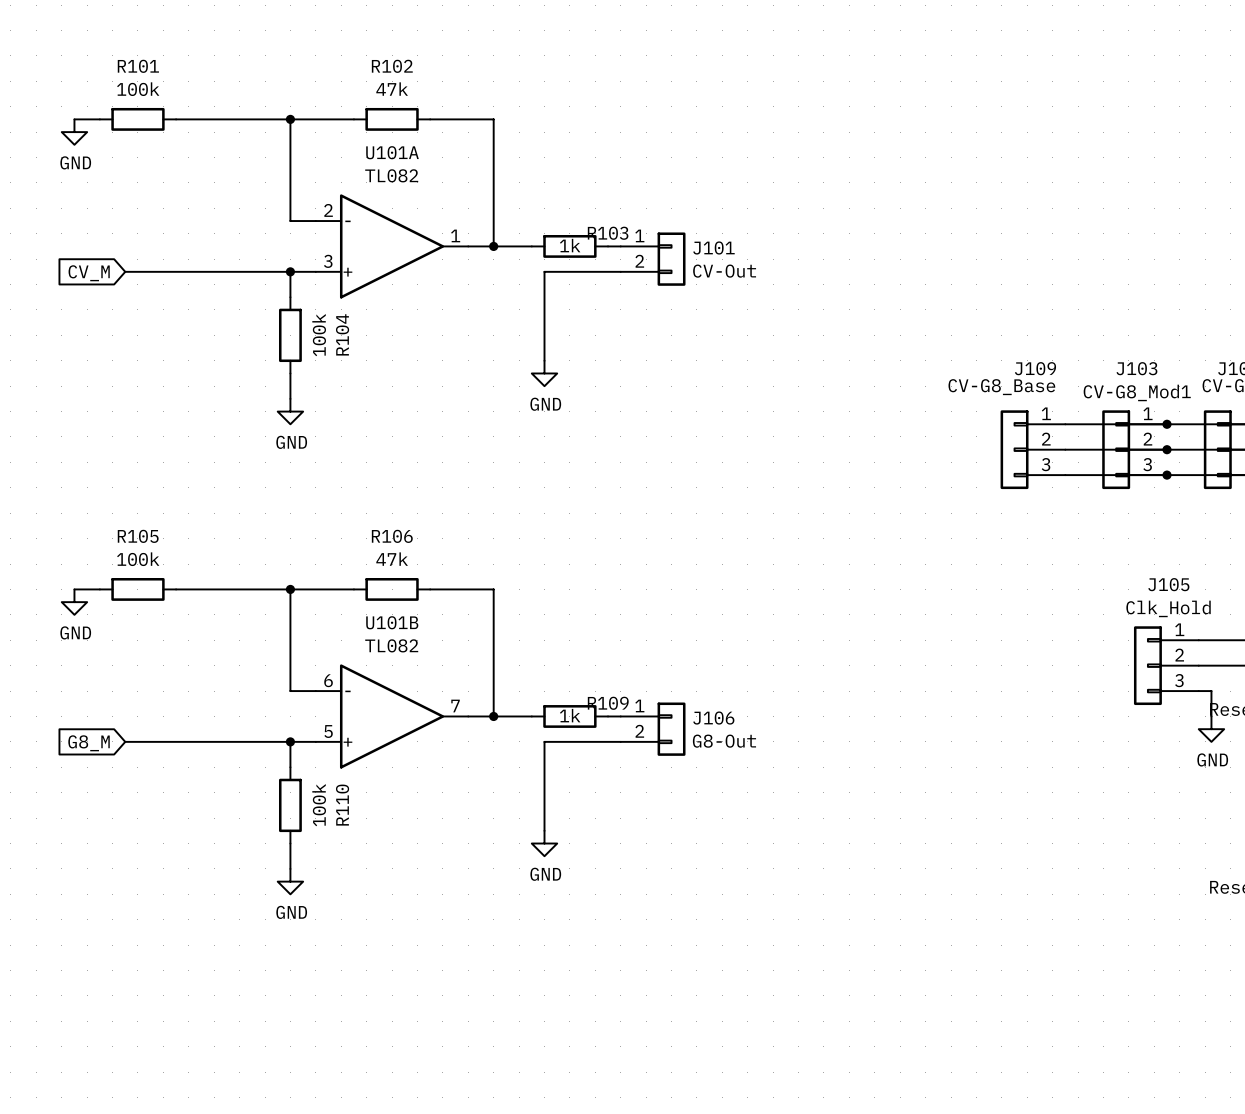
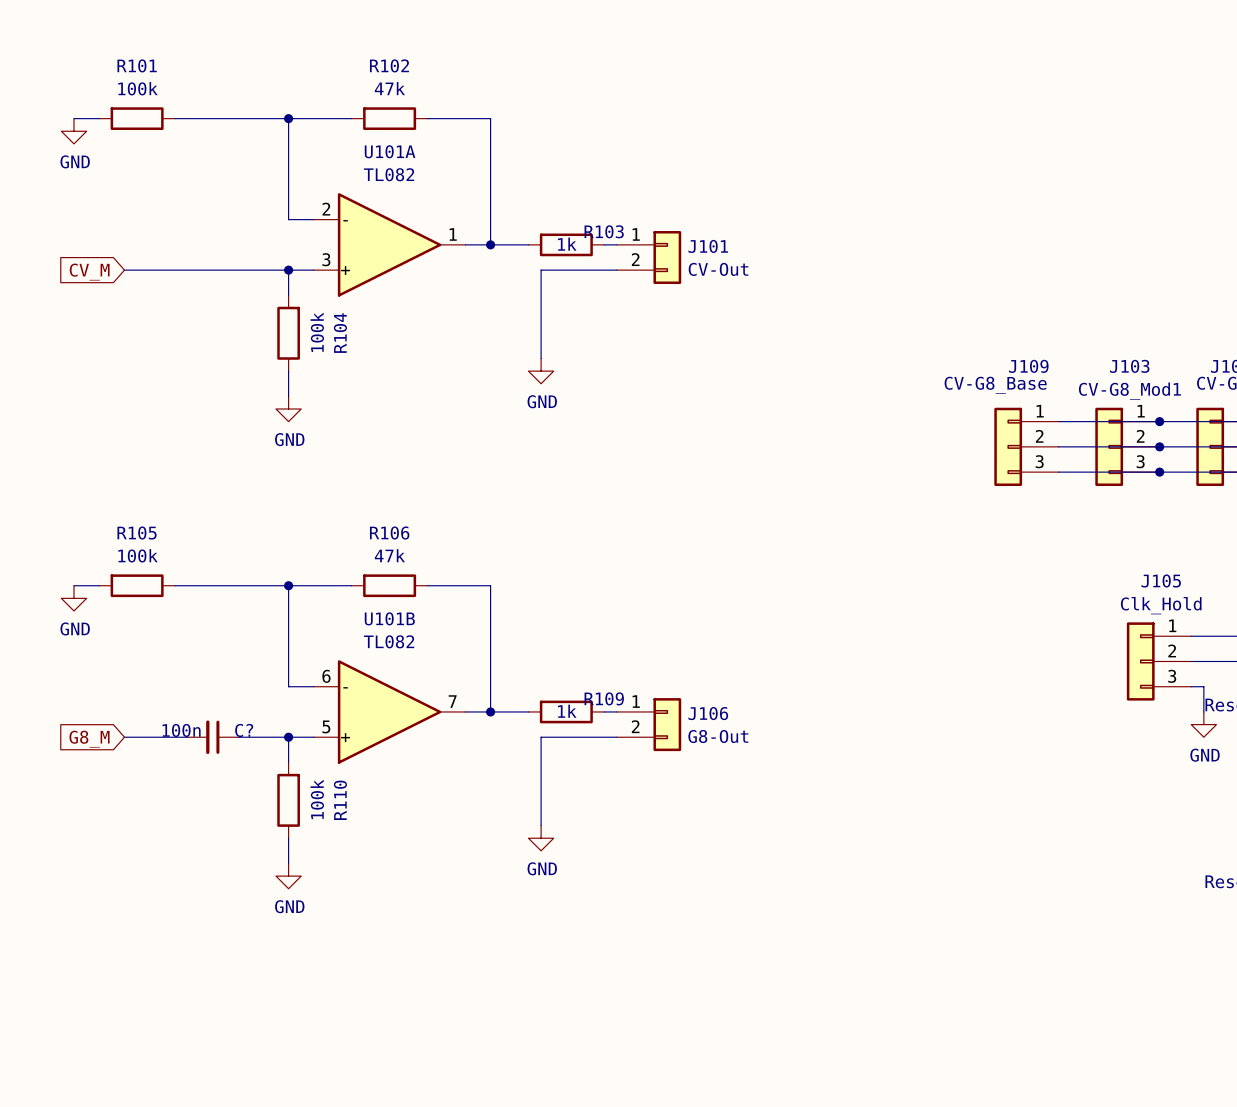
C?: none -> 100n (212, 737)

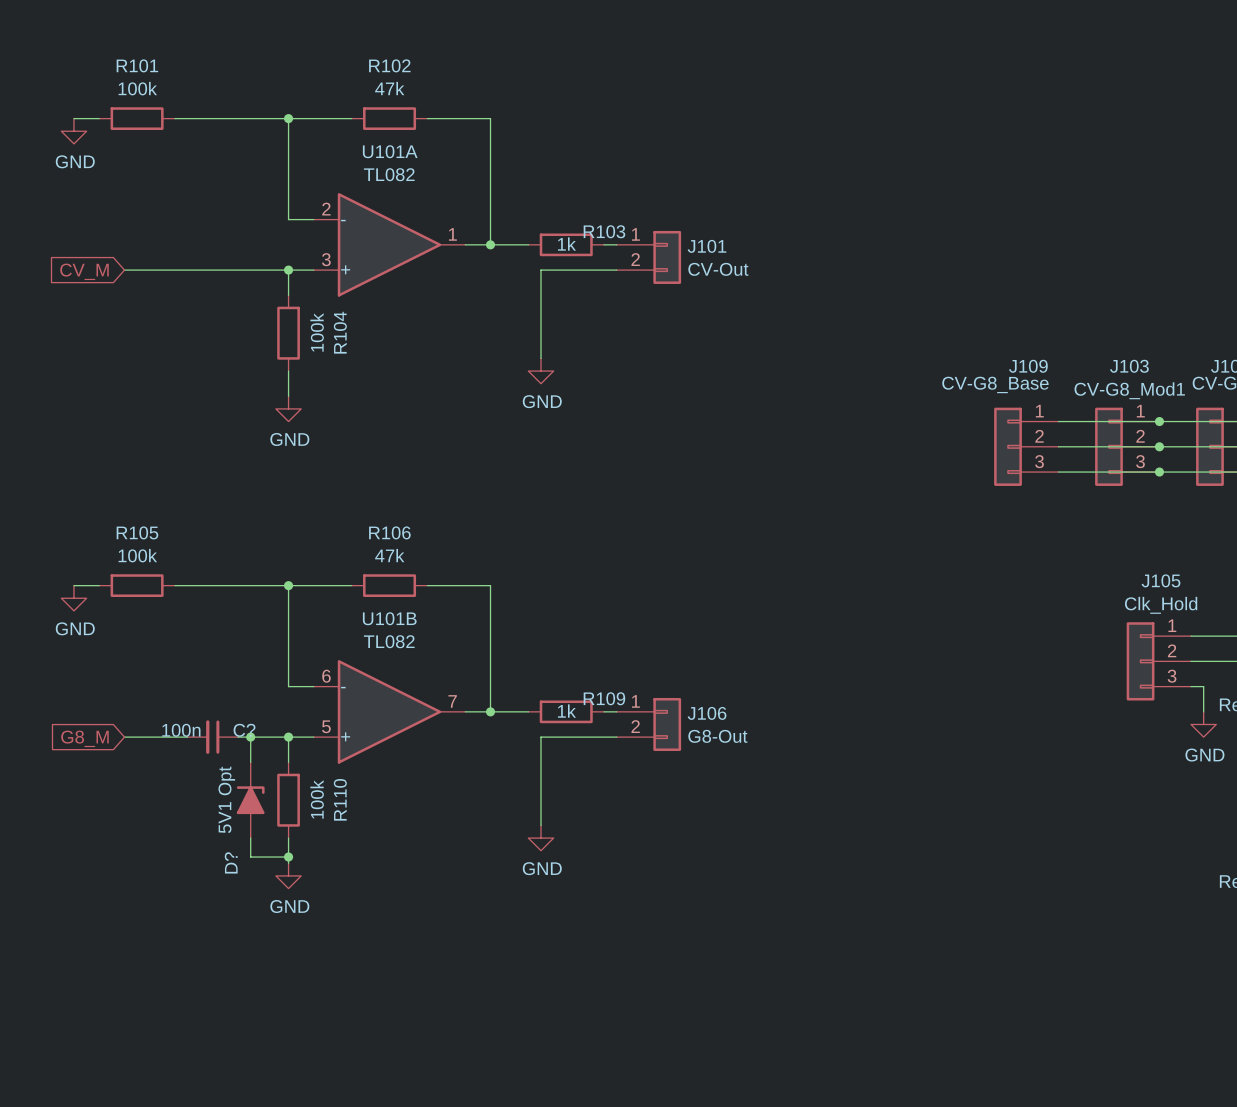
wire: none -> (250, 737) (250, 762)
junction: none -> (250, 737)
D?: none -> 5V1 Opt (250, 800)
wire: none -> (250, 838) (250, 857) (288, 857)
junction: none -> (288, 857)

